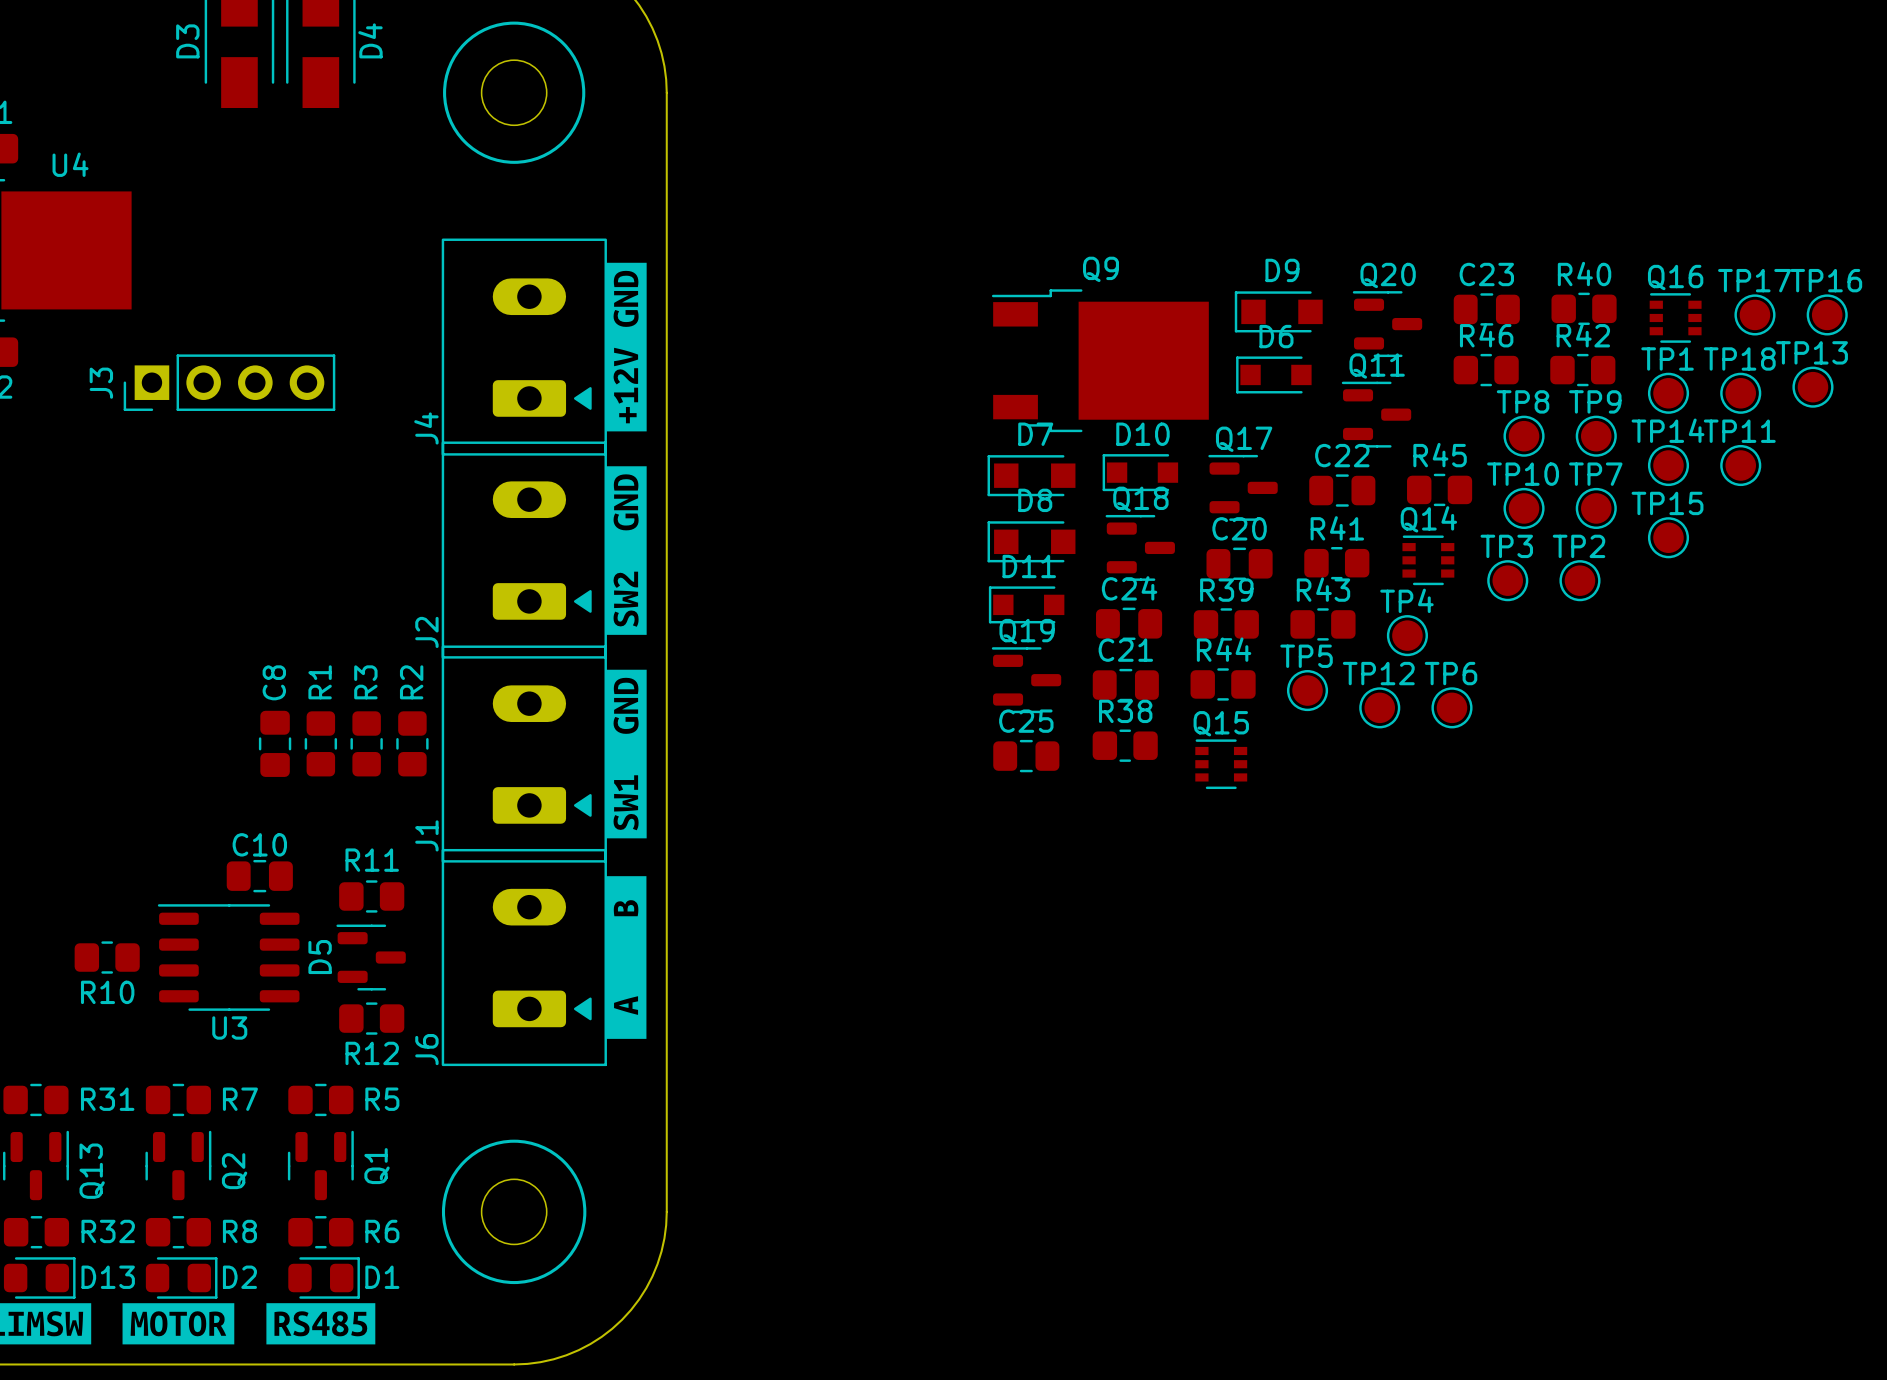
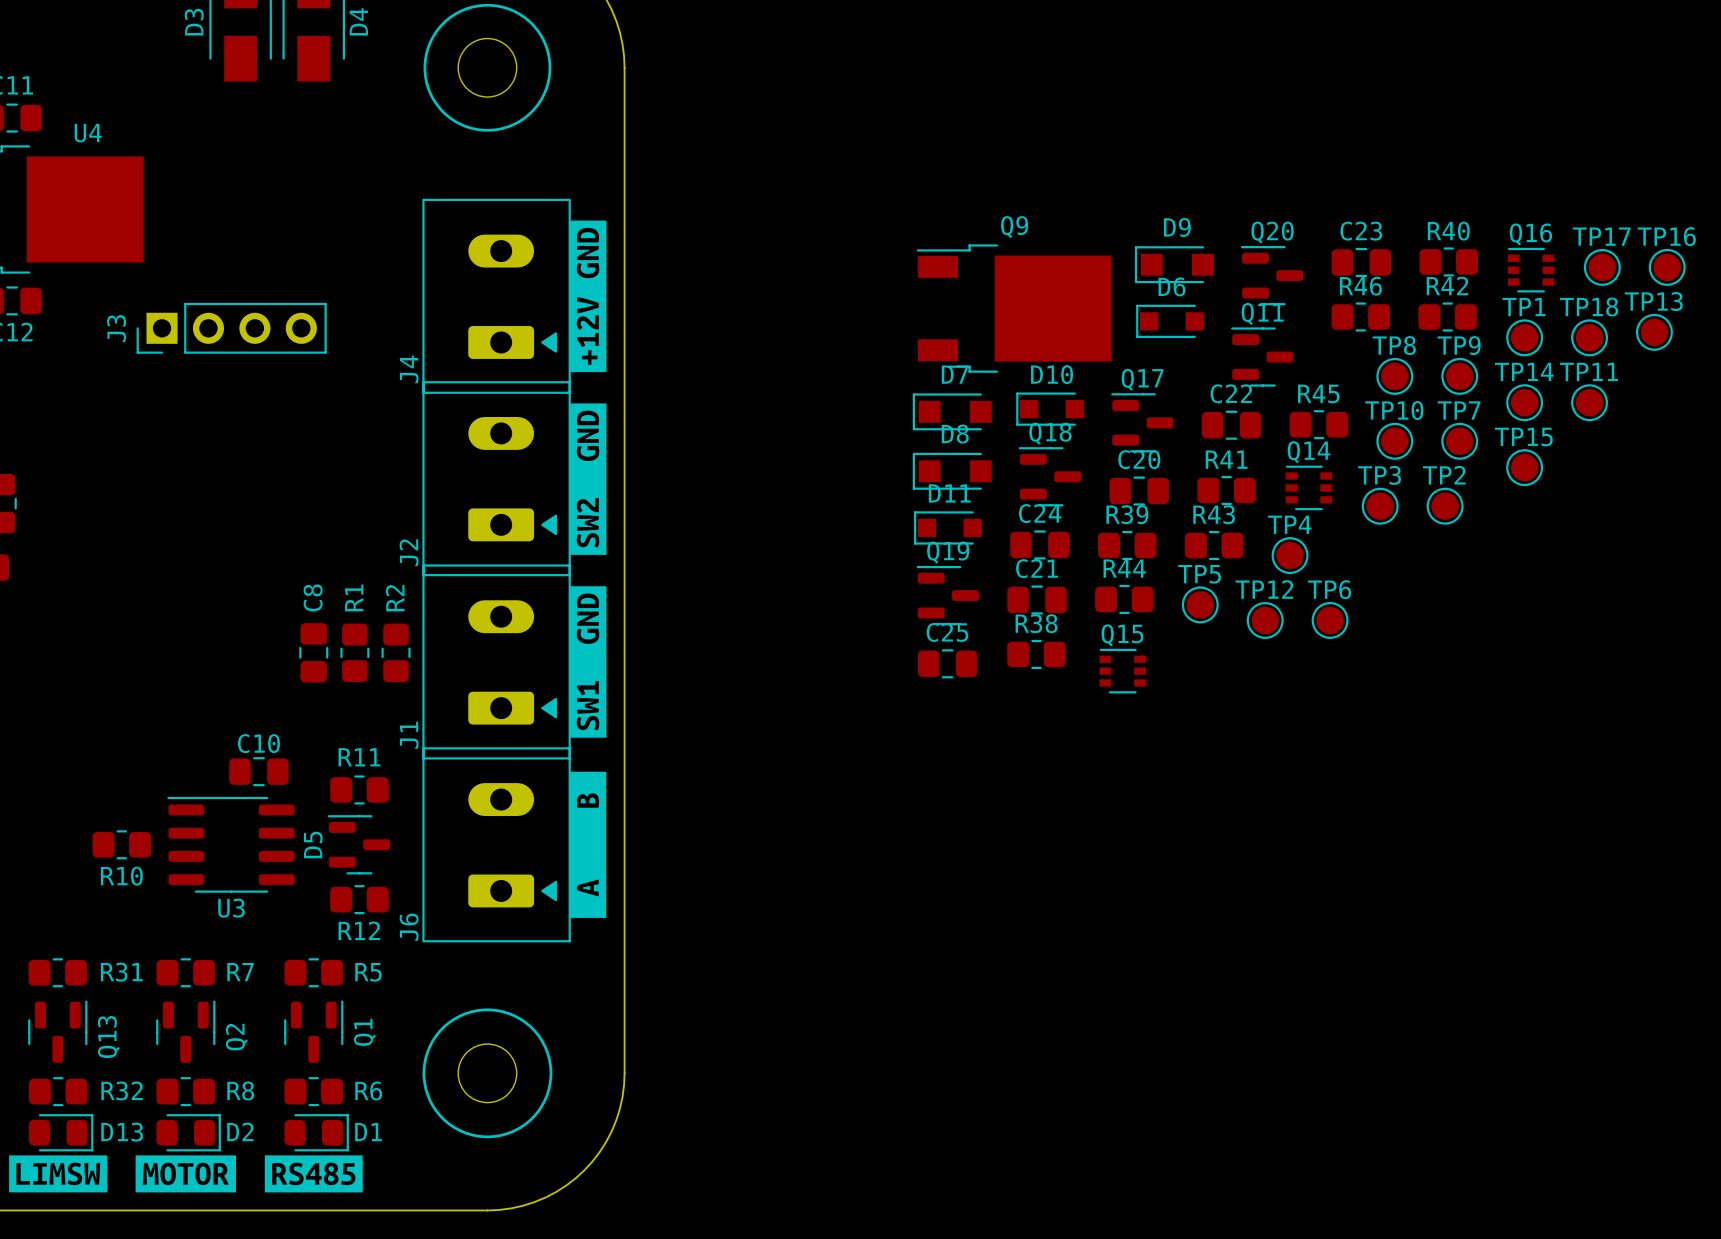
R3 name: R3 (365, 682) -> R1 (354, 597)
C8 position: (275, 743) -> (313, 652)
R1: (320, 743) -> none

